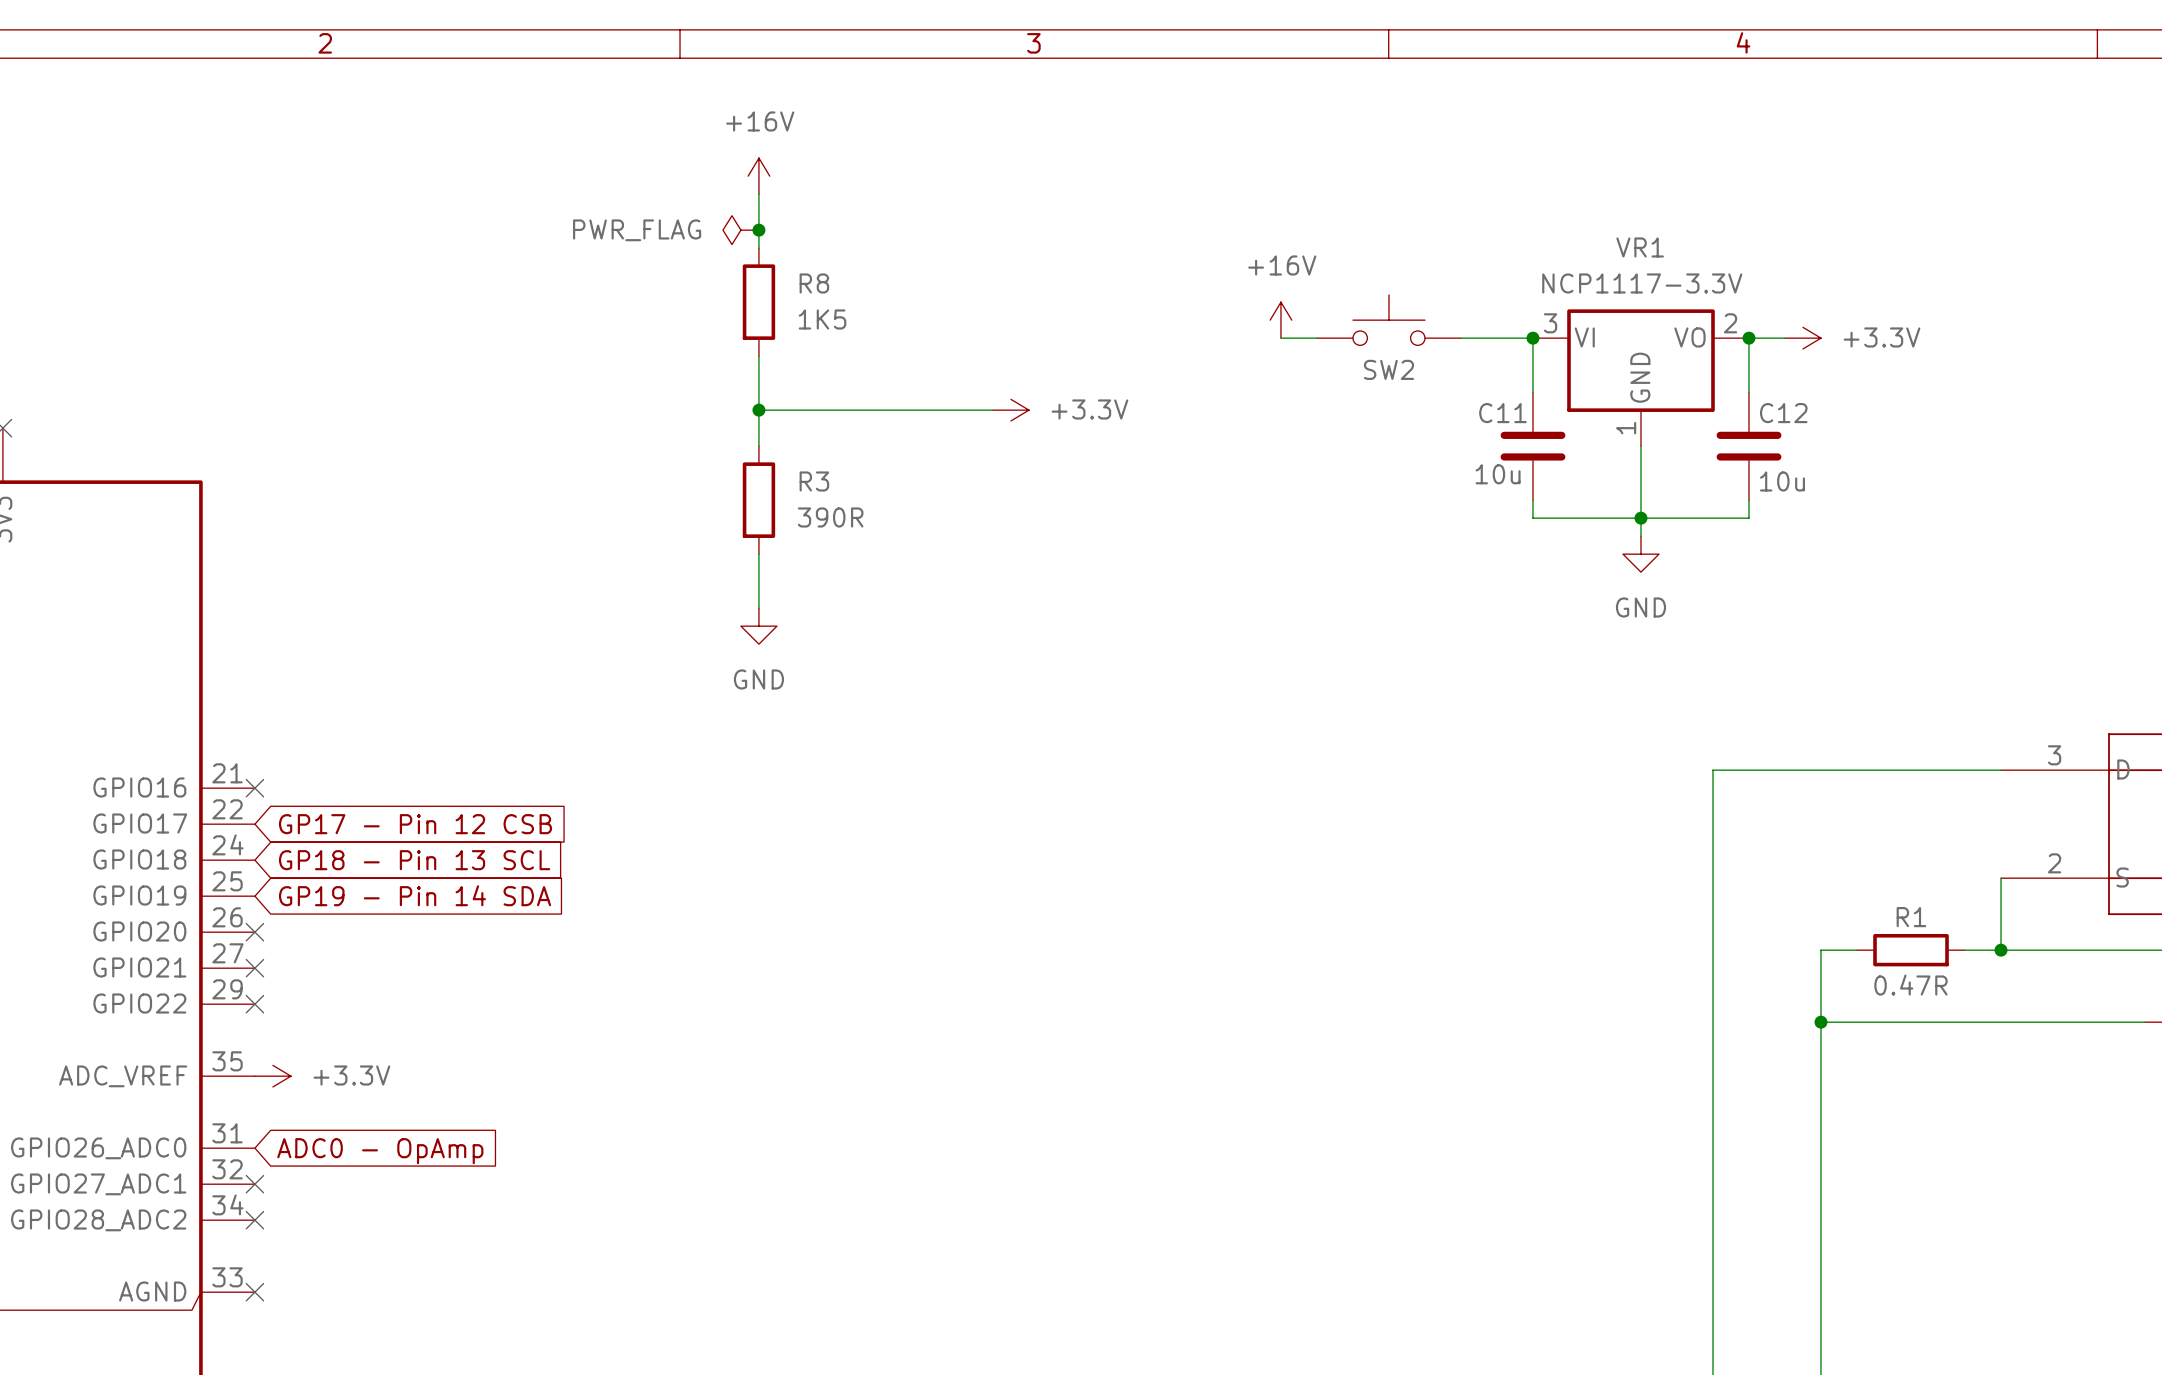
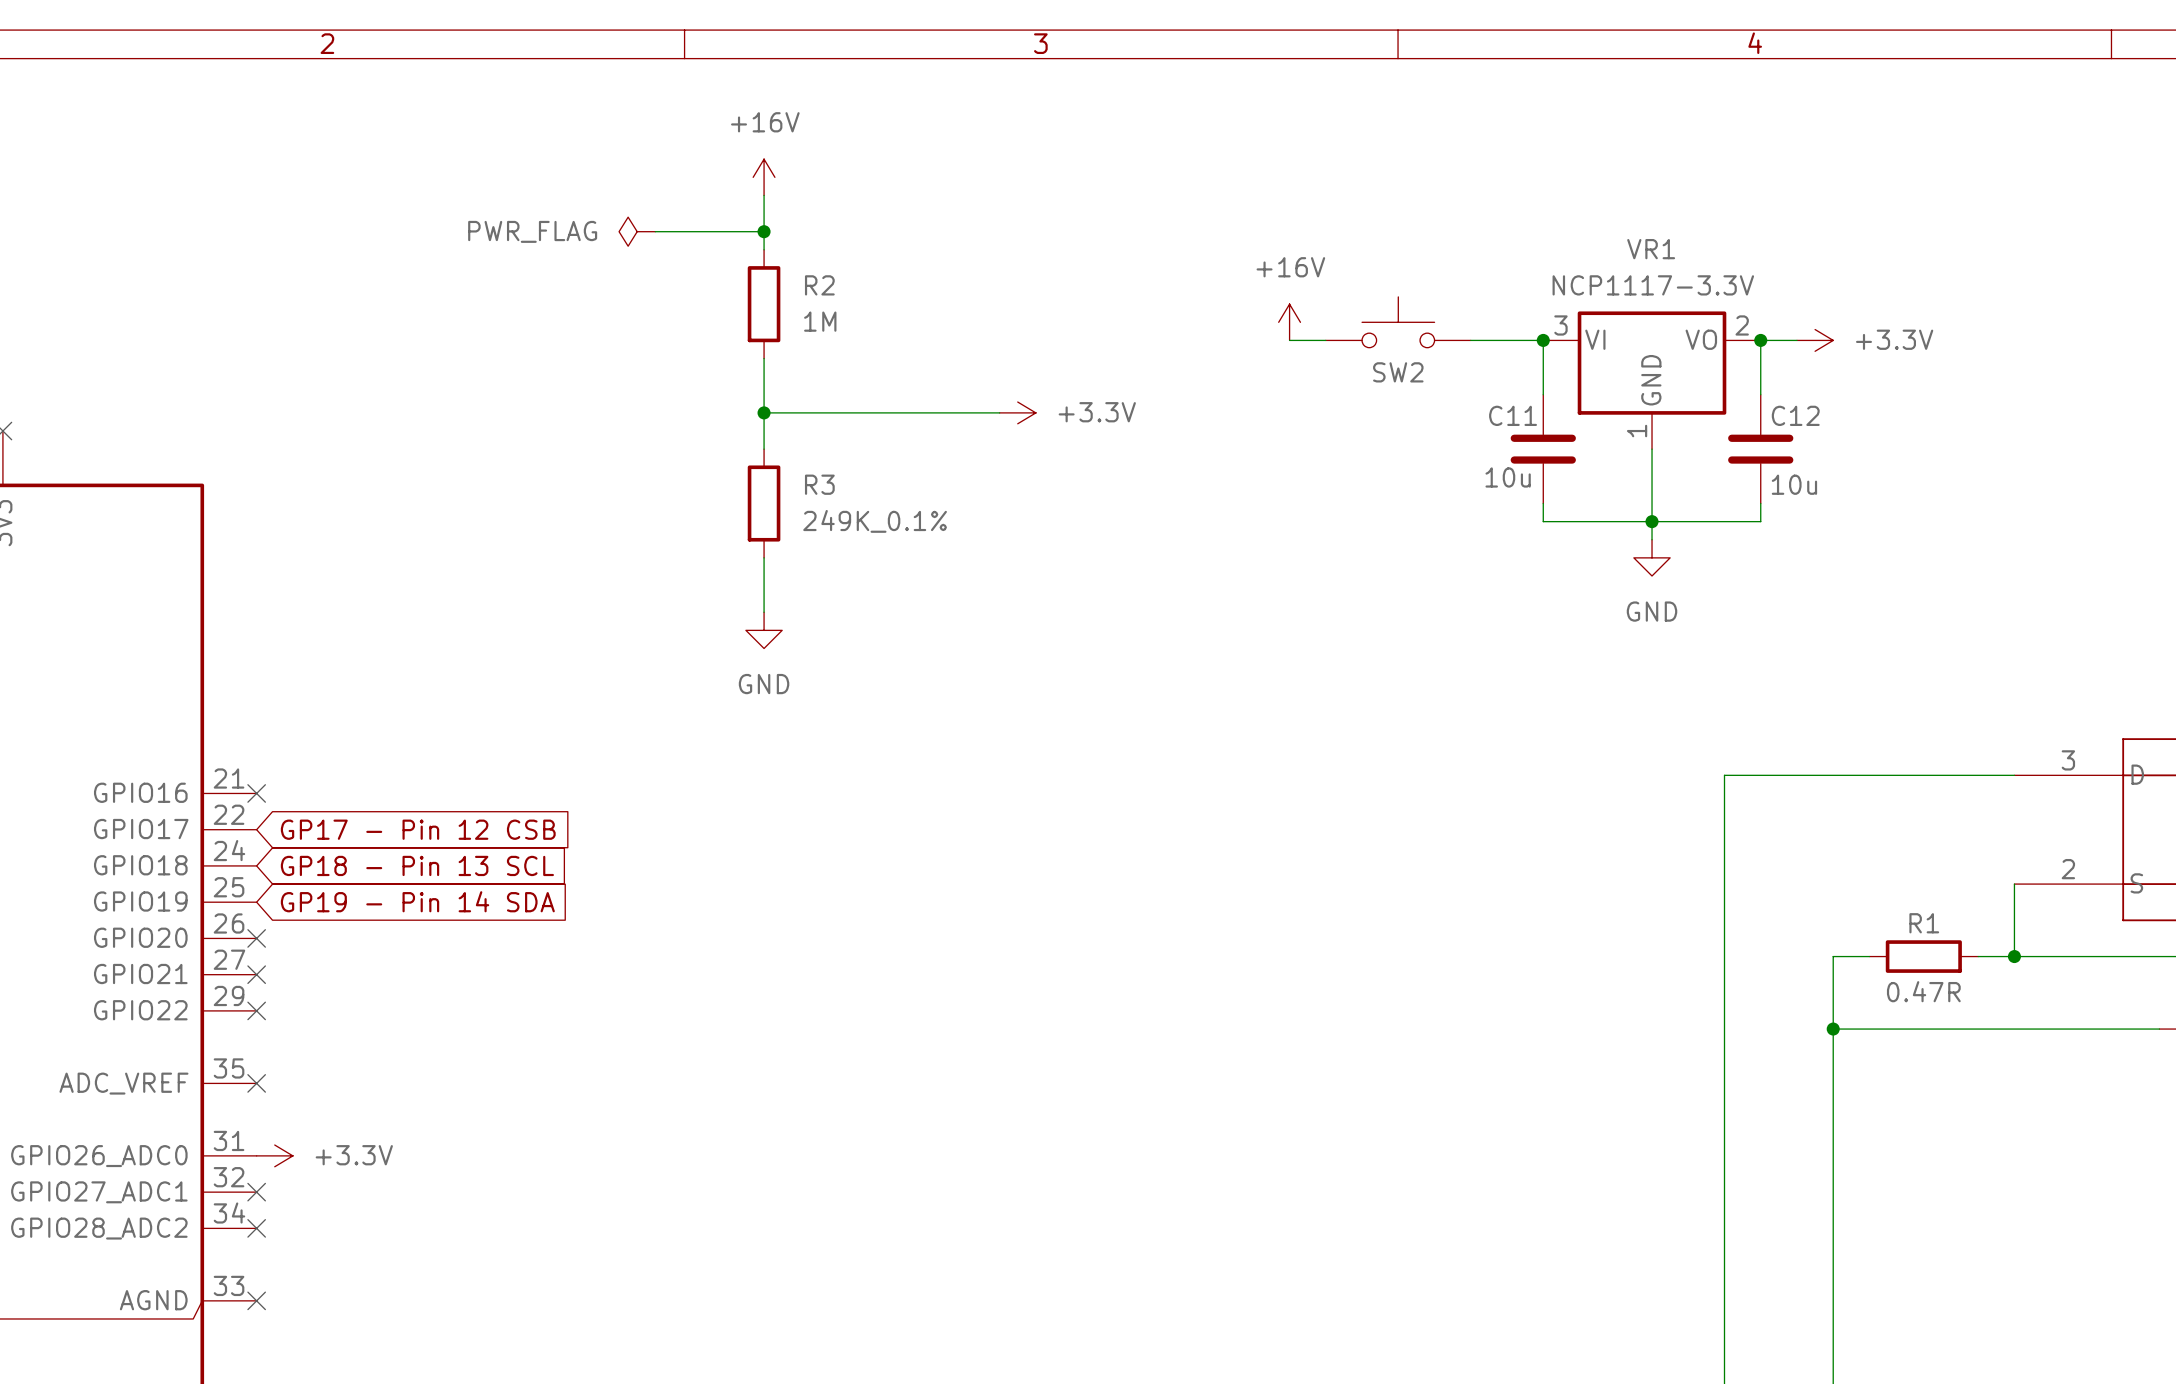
wire: none -> (655, 231) (764, 231)
power symbol position: PWR_FLAG (740, 230) -> PWR_FLAG (637, 231)
R8 name: R8 (814, 283) -> R2 (819, 285)
R8 value: 1K5 (822, 319) -> 1M (820, 321)
R3 value: 390R (830, 517) -> 249K_0.1% (875, 521)
no-connect mark: none -> (256, 1083)
power symbol position: +3.3V (272, 1076) -> +3.3V (274, 1155)
global label: ADC0 - OpAmp (380, 1151) -> none

